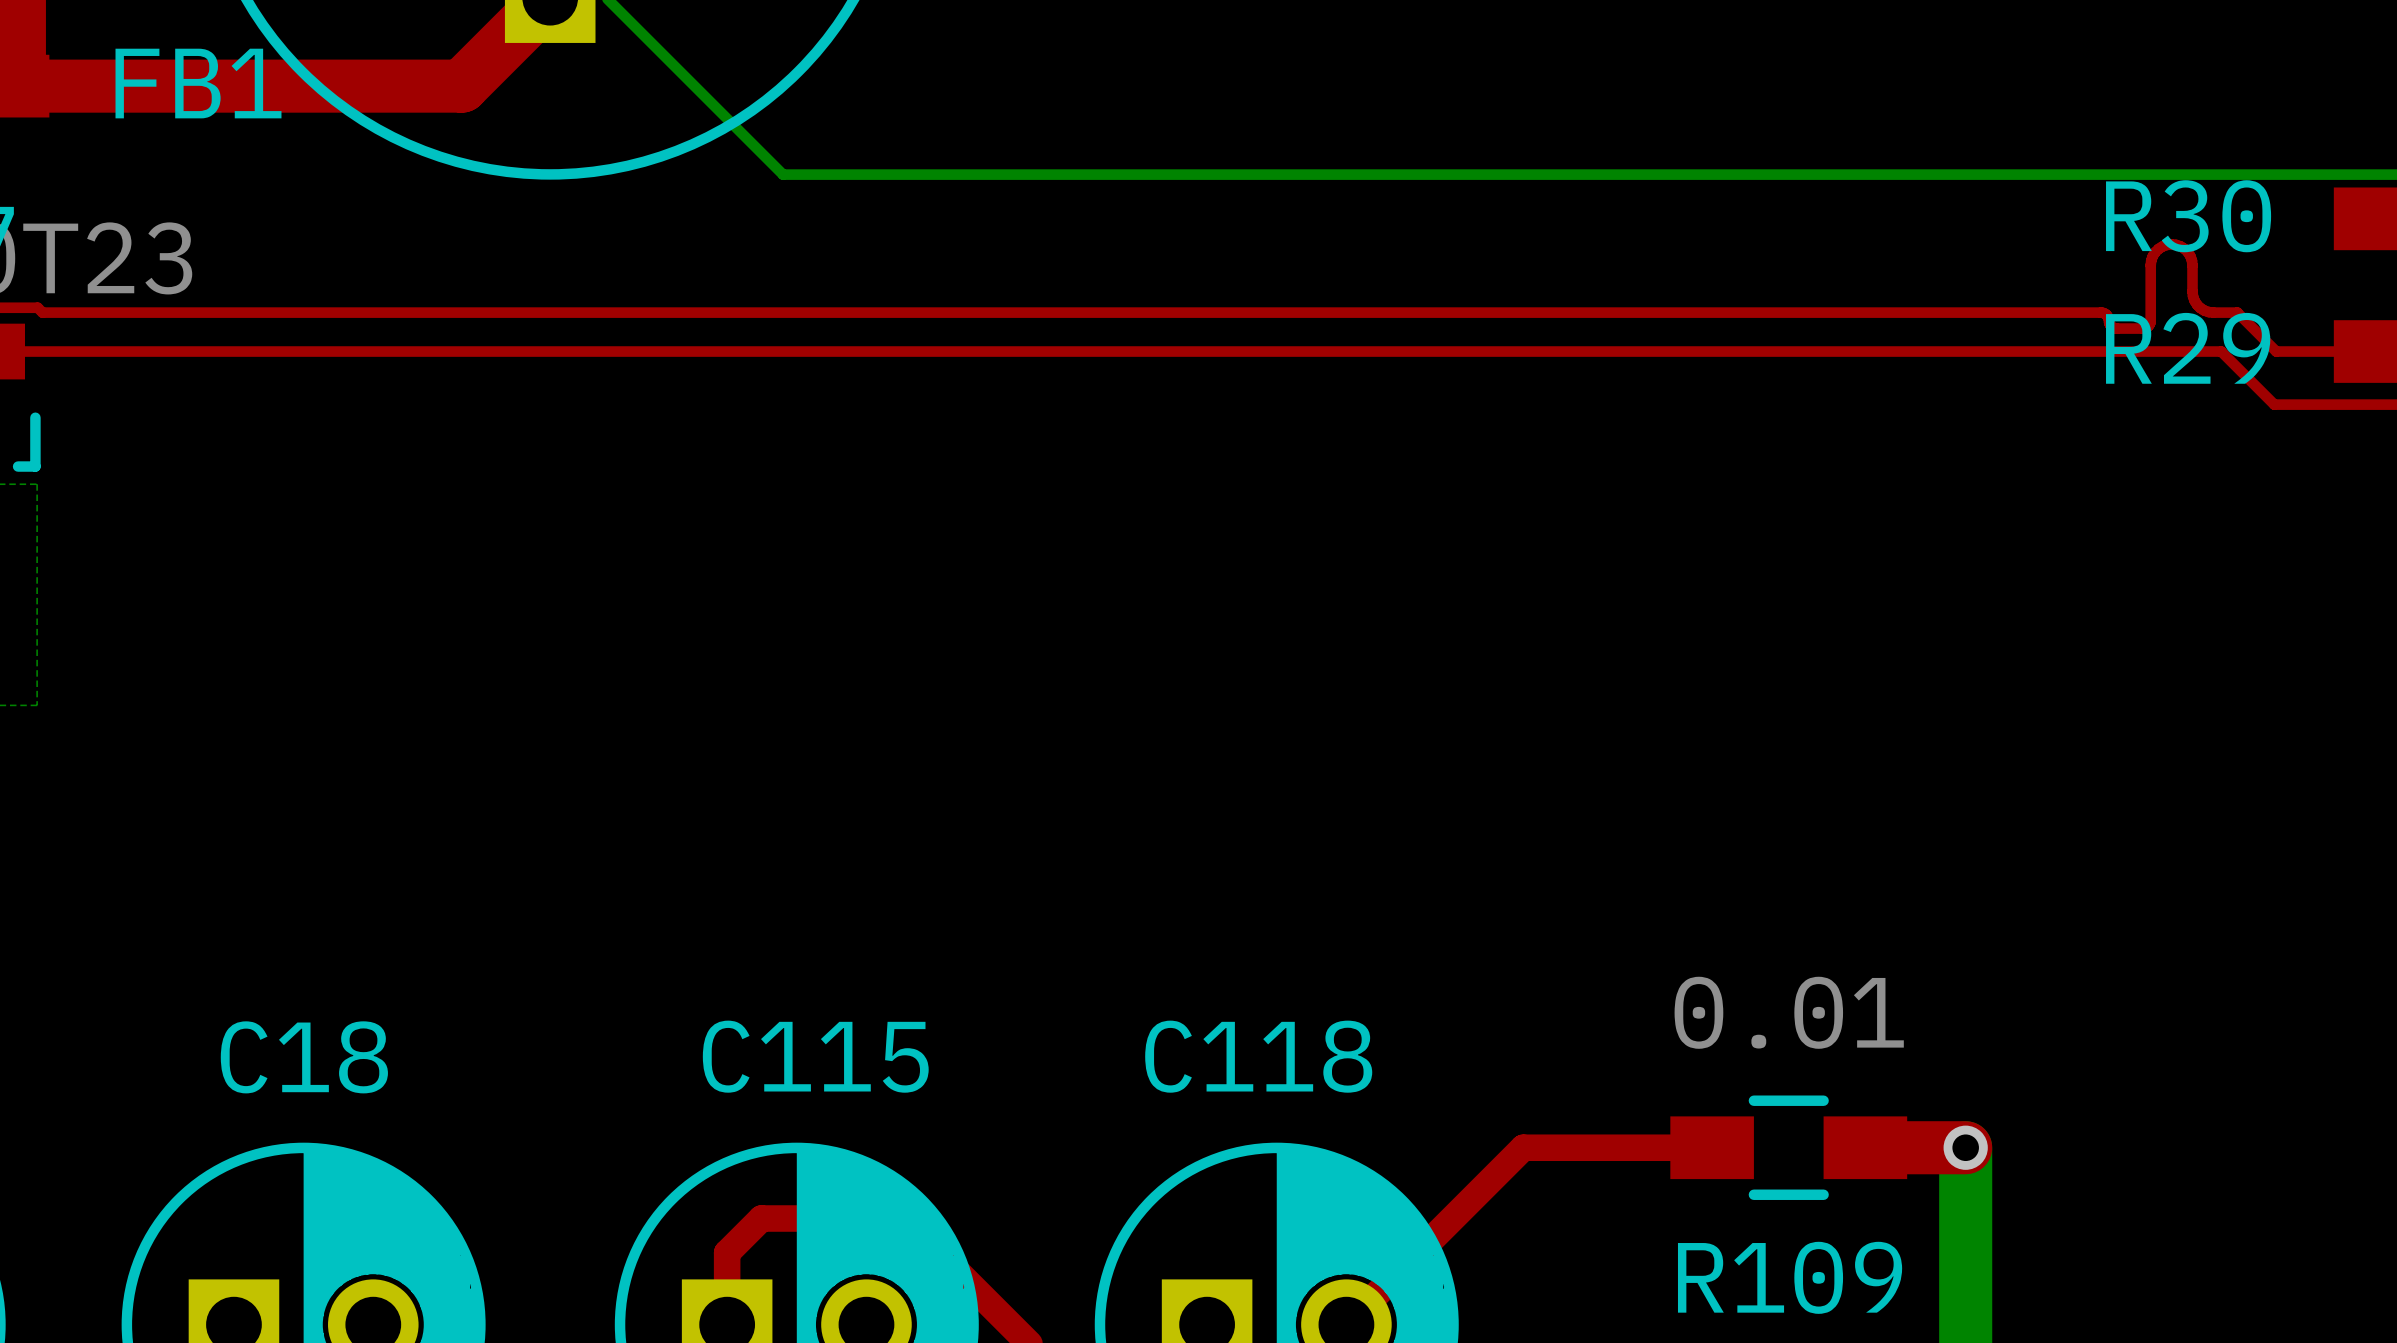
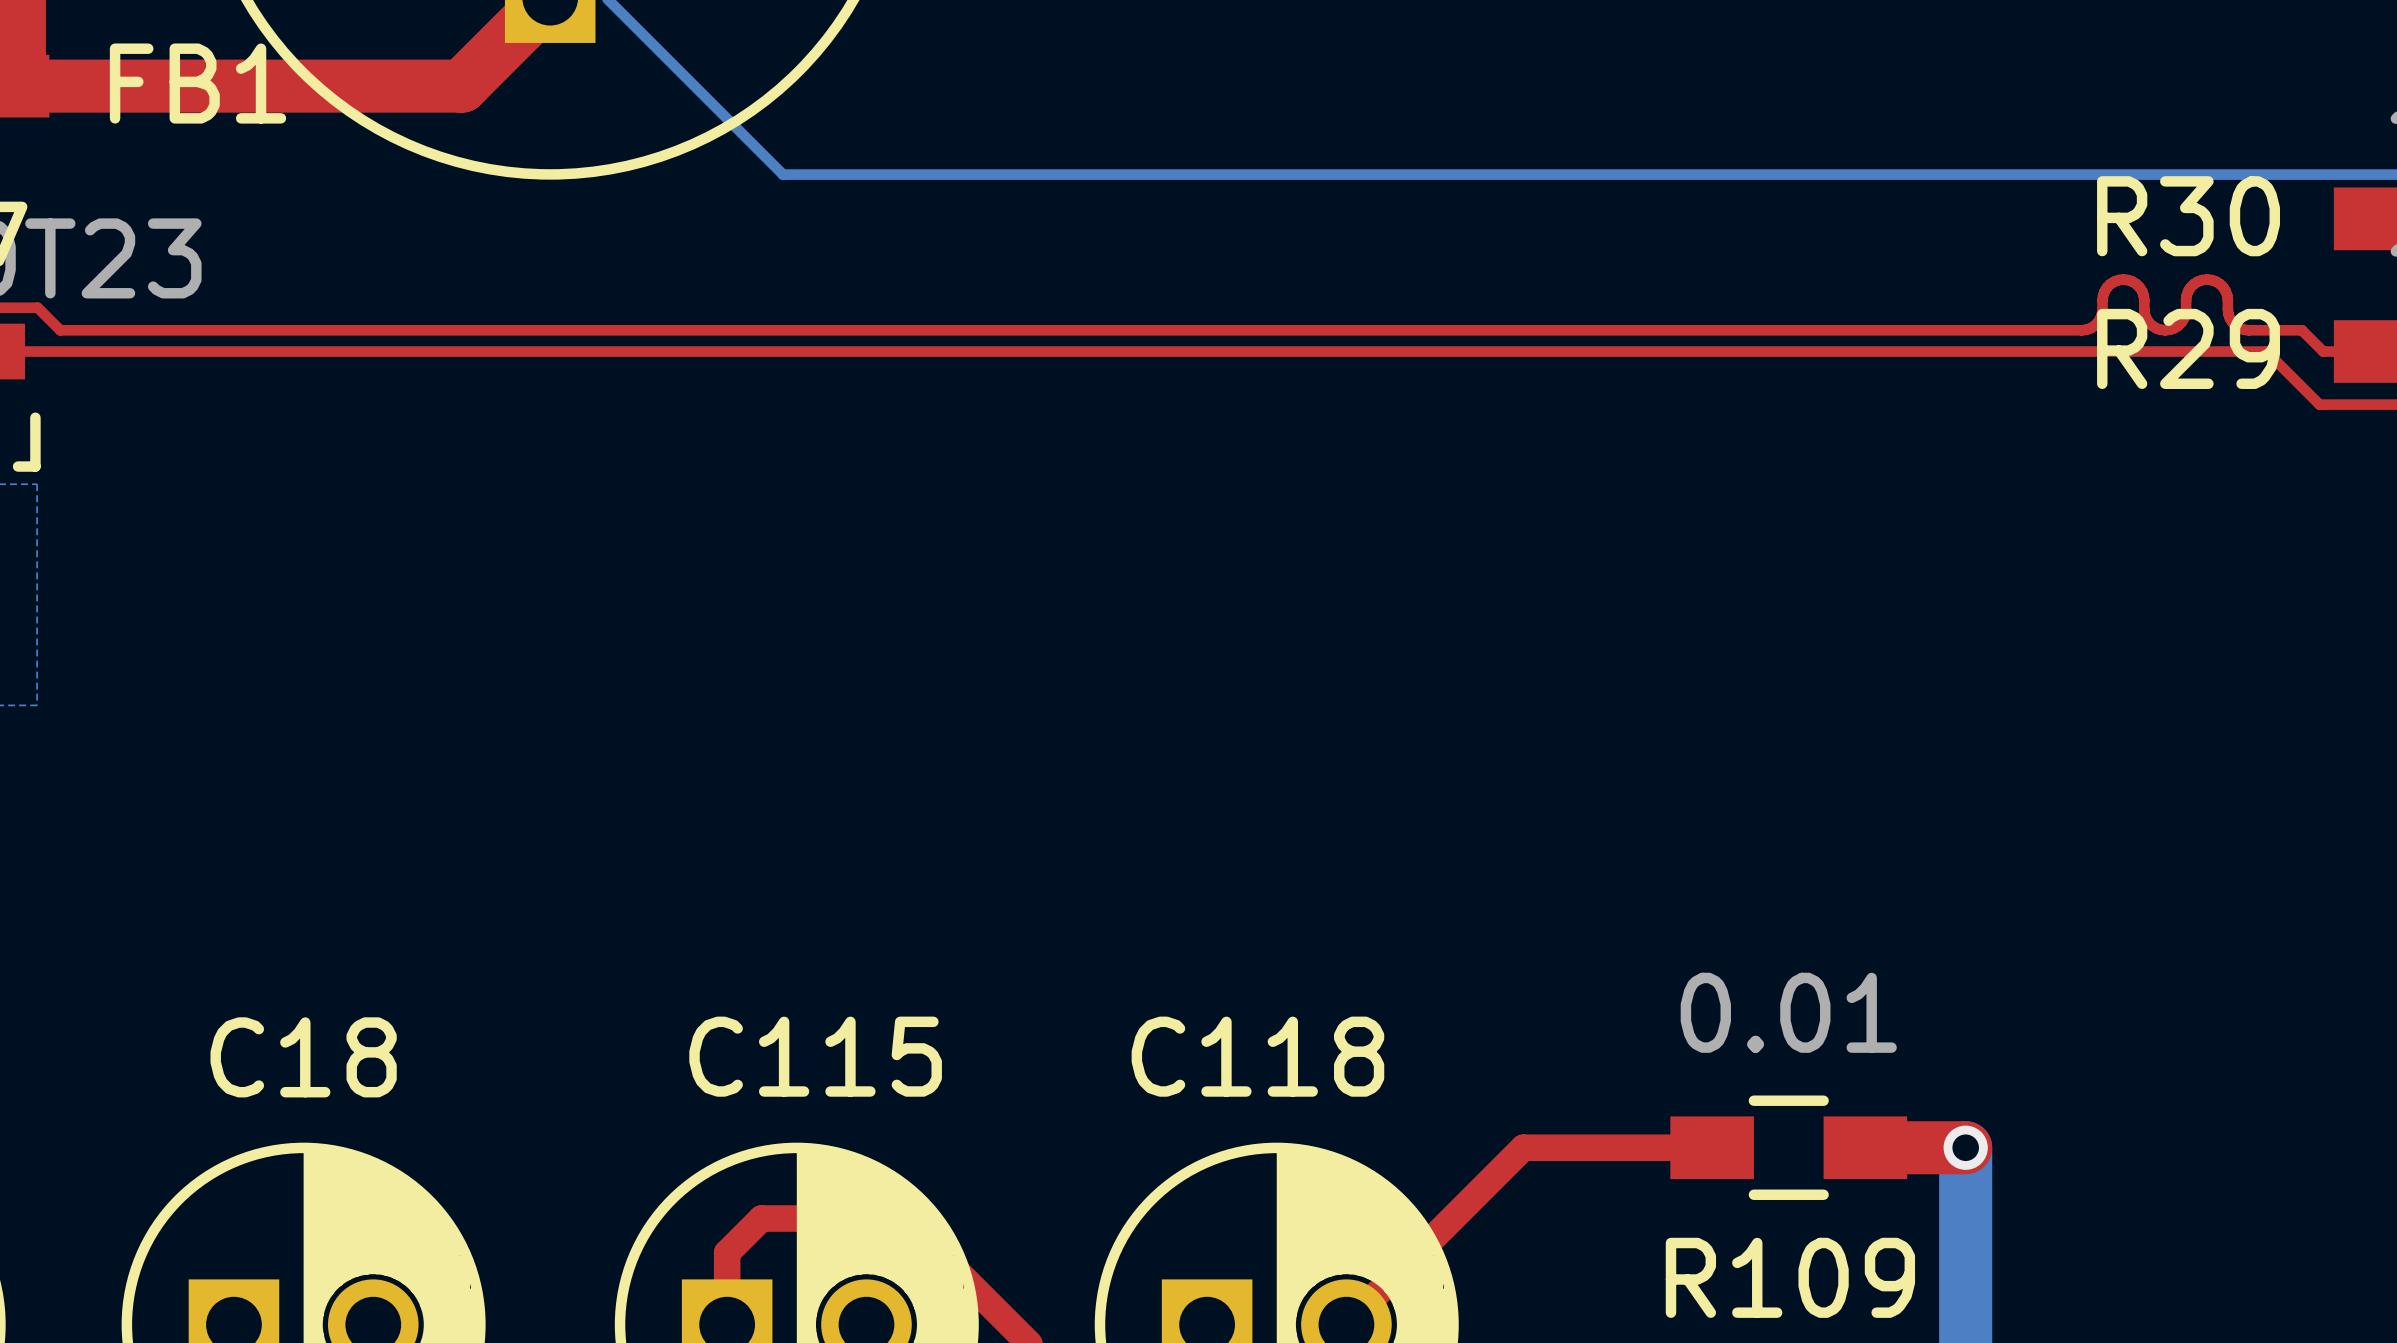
top track: (42, 312) (2100, 312) (2107, 315) (2109, 324) (2113, 327) (2142, 328) (2147, 326) (2150, 322) (2151, 260) (2158, 248) (2171, 244) (2180, 246) (2190, 256) (2193, 296) (2200, 308) (2208, 312) (2237, 312) (2276, 351) (2323, 351) -> (42, 312) (60, 330) (2081, 330) (2090, 328) (2100, 318) (2103, 295) (2107, 287) (2114, 281) (2123, 279) (2132, 281) (2142, 291) (2144, 314) (2148, 322) (2156, 328) (2165, 330) (2174, 328) (2184, 318) (2186, 295) (2190, 287) (2197, 281) (2206, 279) (2216, 281) (2223, 287) (2227, 295) (2229, 318) (2239, 328) (2248, 330) (2301, 330) (2323, 351)
top track: (2221, 351) (2274, 404) (2319, 404) -> (2221, 351) (2266, 351) (2319, 404)

